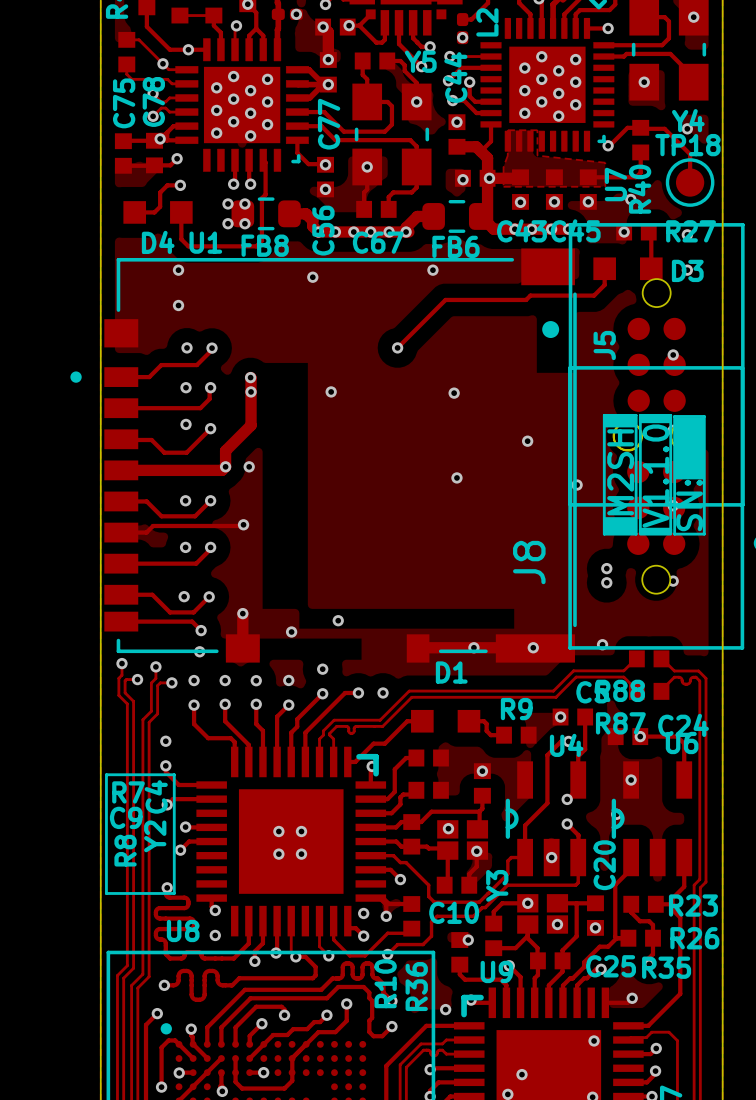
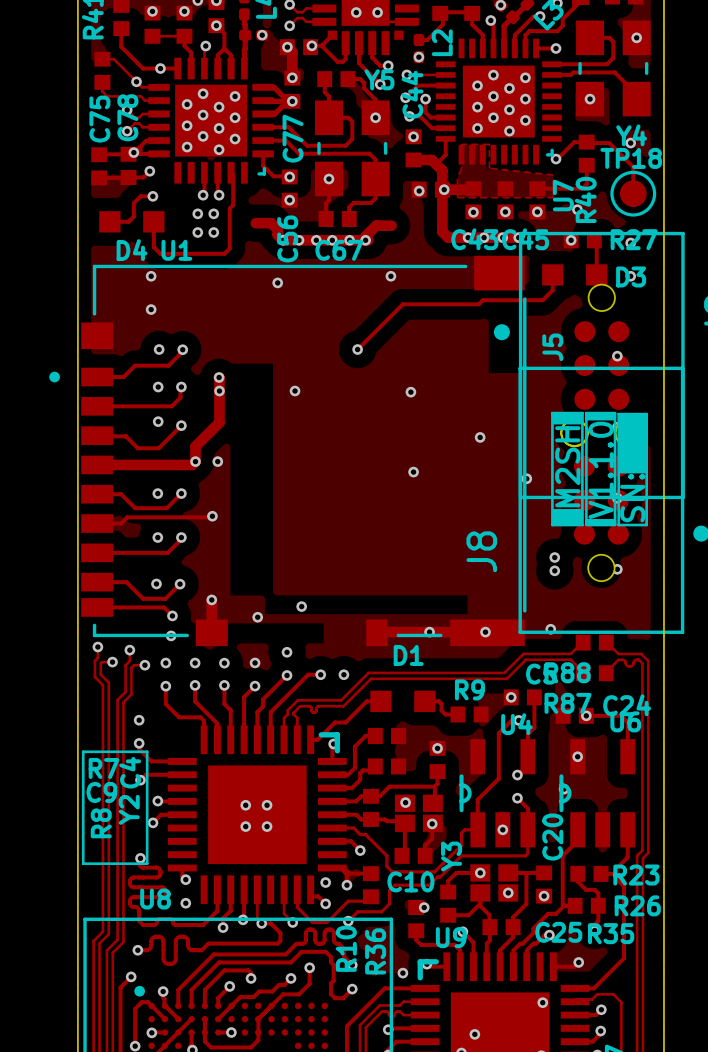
FB8: (266, 213) -> none
FB6: (456, 216) -> none

